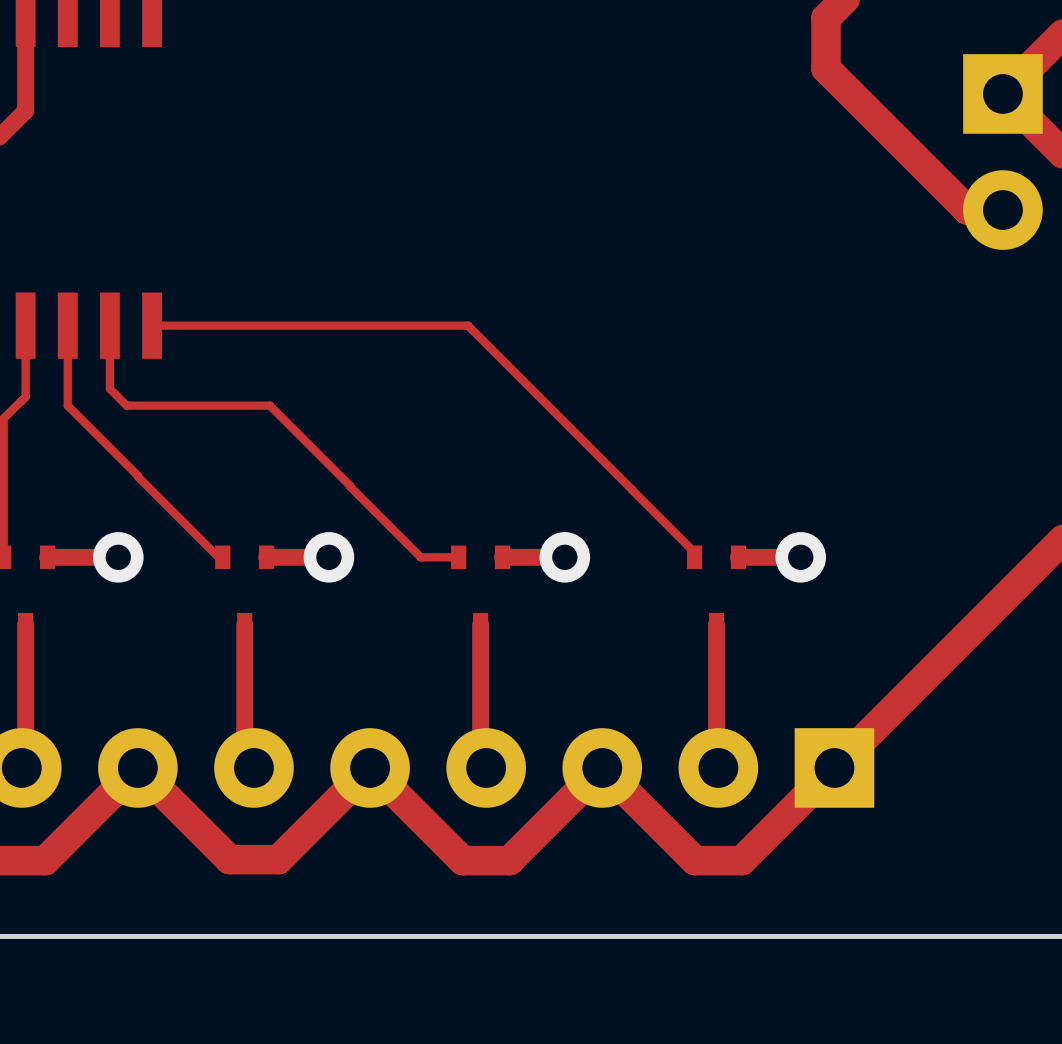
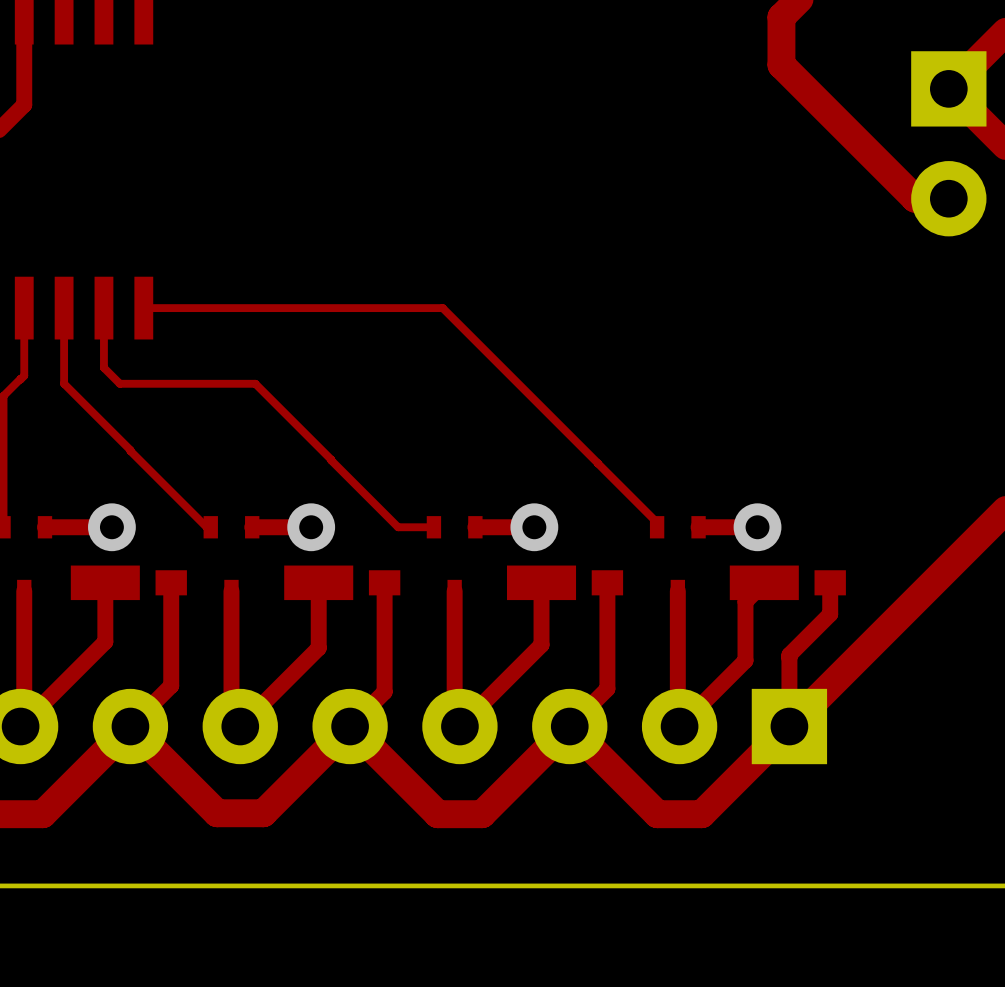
top track: none -> (105, 582) (105, 641) (24, 722)
part: none -> (128, 582)
top track: none -> (171, 582) (171, 685) (130, 726)
top track: none -> (318, 582) (318, 648) (240, 726)
part: none -> (342, 582)
top track: none -> (384, 582) (384, 692) (350, 726)
top track: none -> (541, 582) (541, 644) (459, 726)
part: none -> (565, 582)
top track: none -> (607, 582) (607, 688) (569, 726)
top track: none -> (764, 582) (745, 601) (745, 660) (679, 726)
part: none -> (787, 582)
top track: none -> (830, 582) (830, 614) (789, 654) (789, 726)

